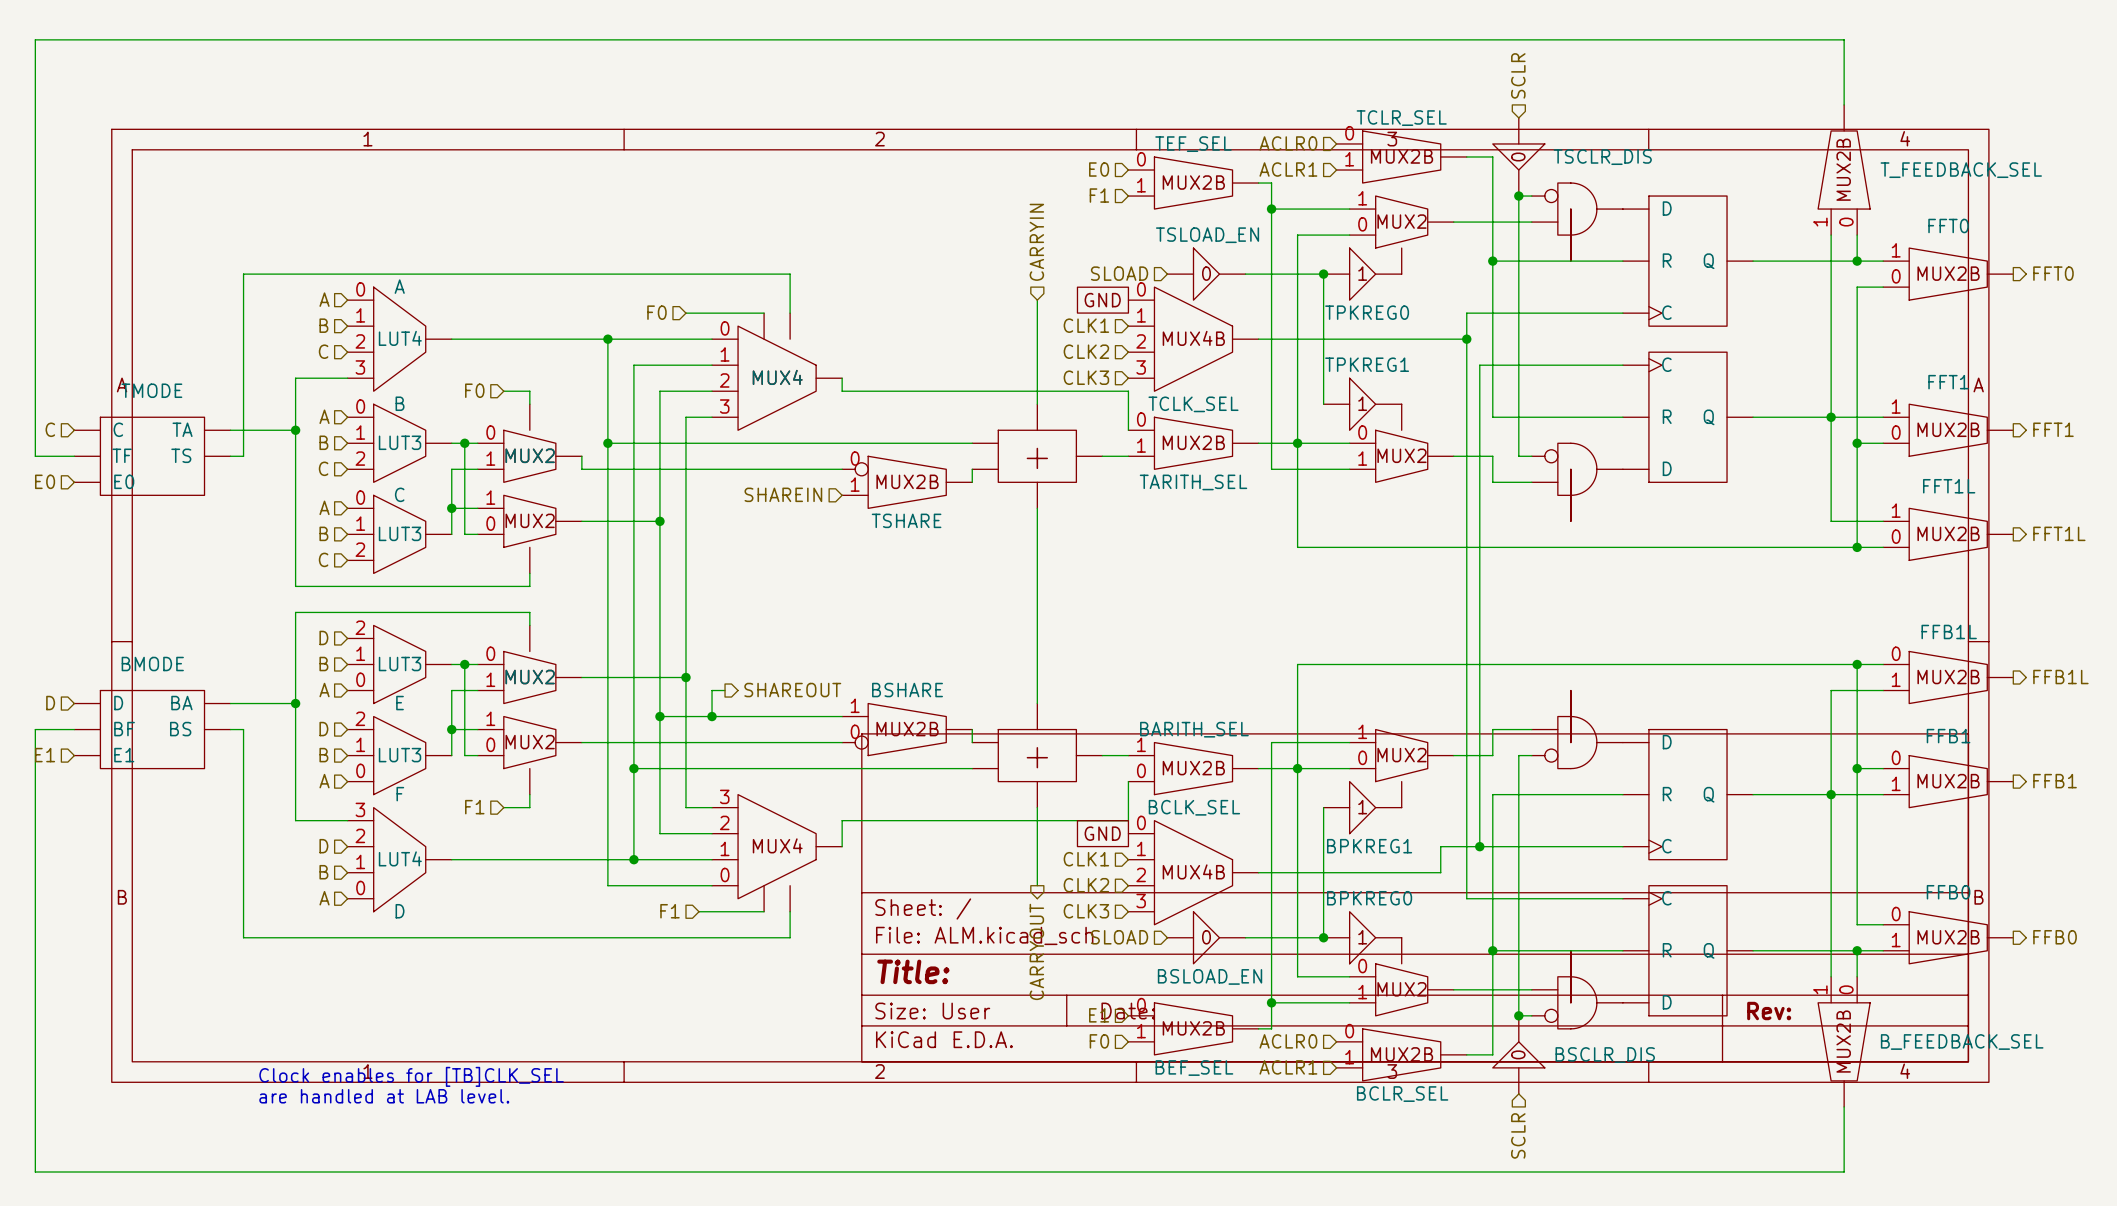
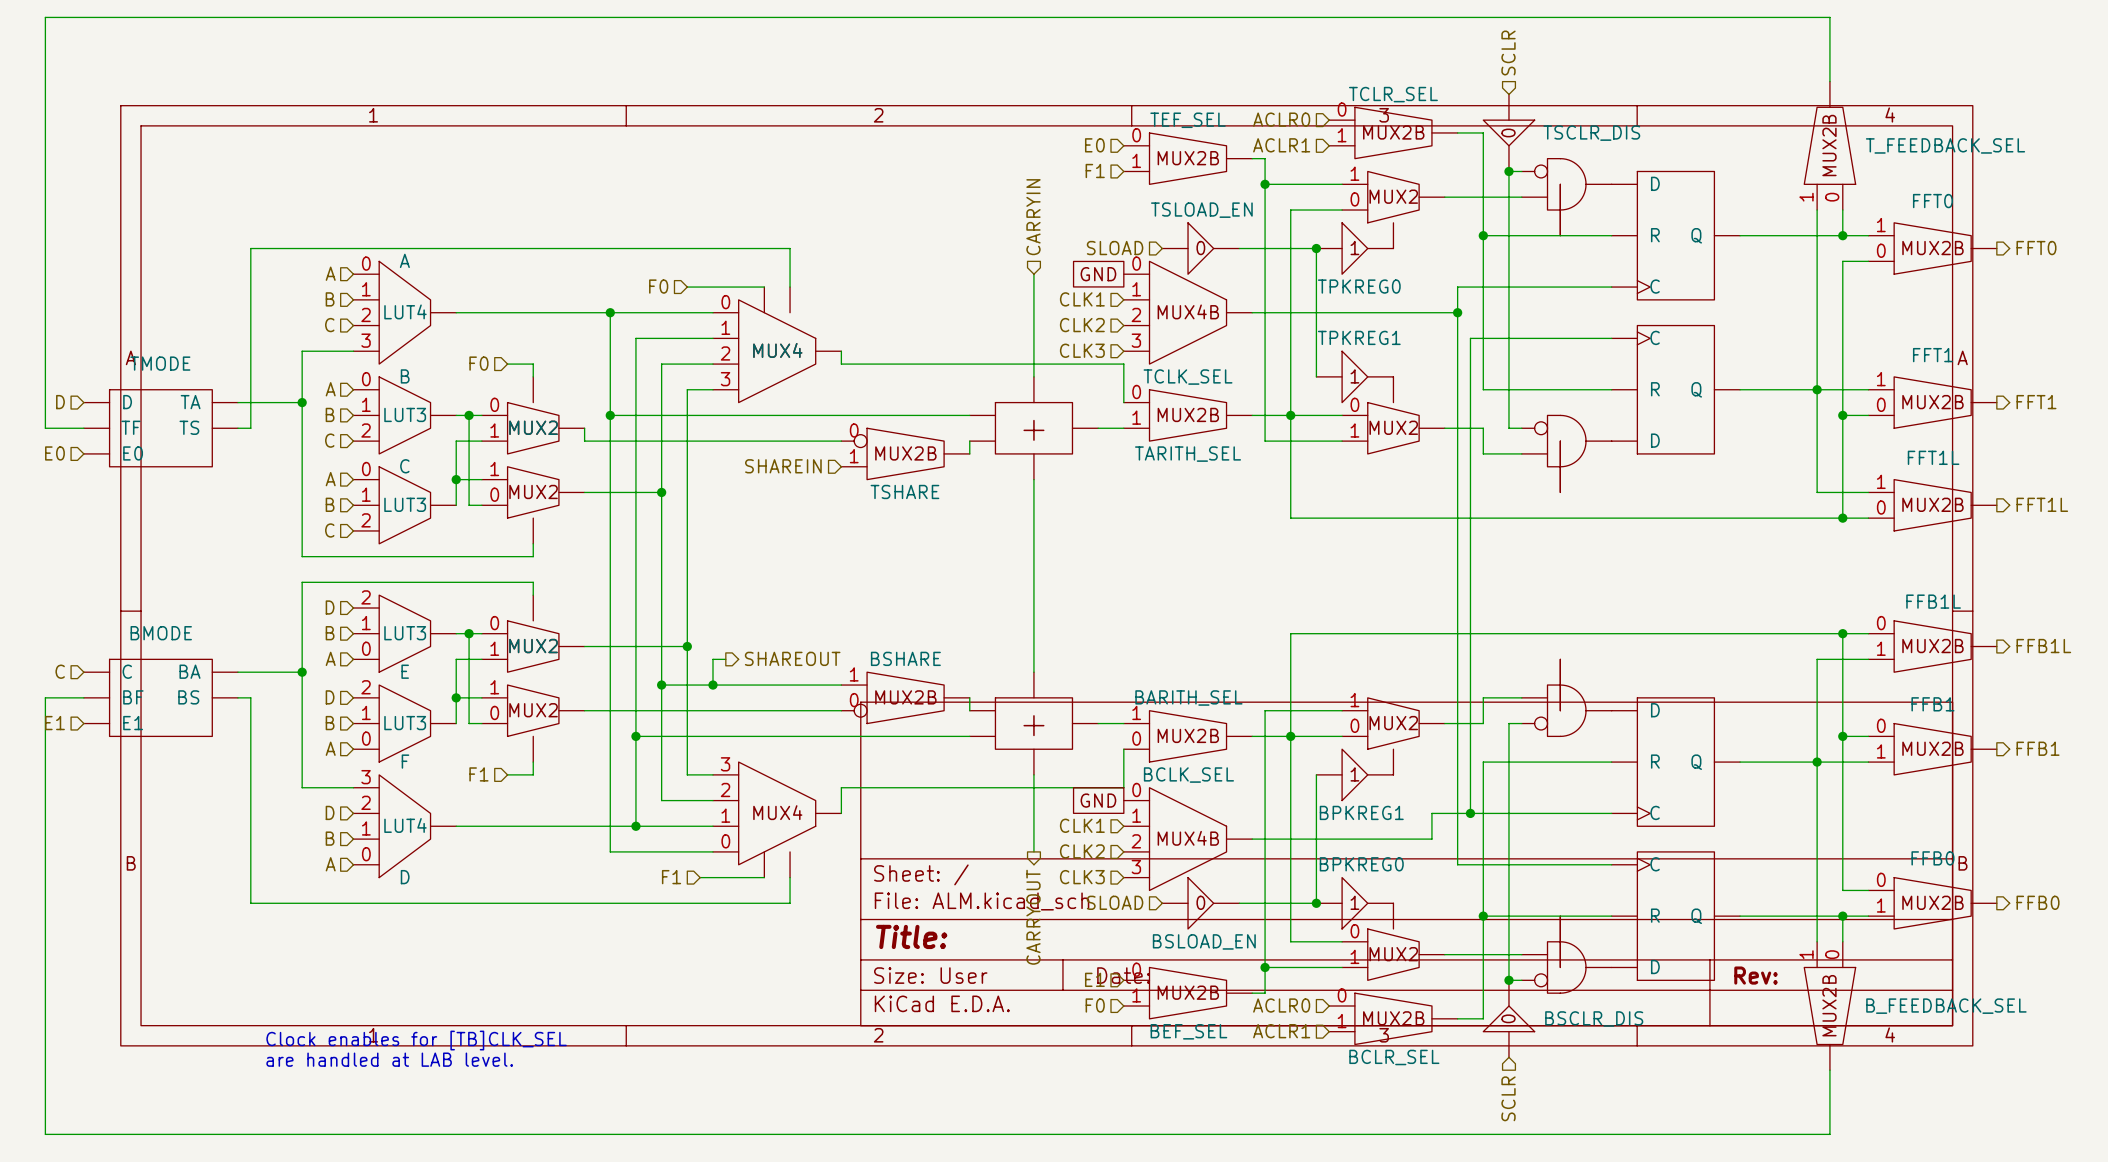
hierarchical label: C (50, 429) -> D (60, 402)
part pin name: C (118, 429) -> D (127, 402)
hierarchical label: D (50, 703) -> C (60, 671)
part pin name: D (118, 703) -> C (127, 671)

